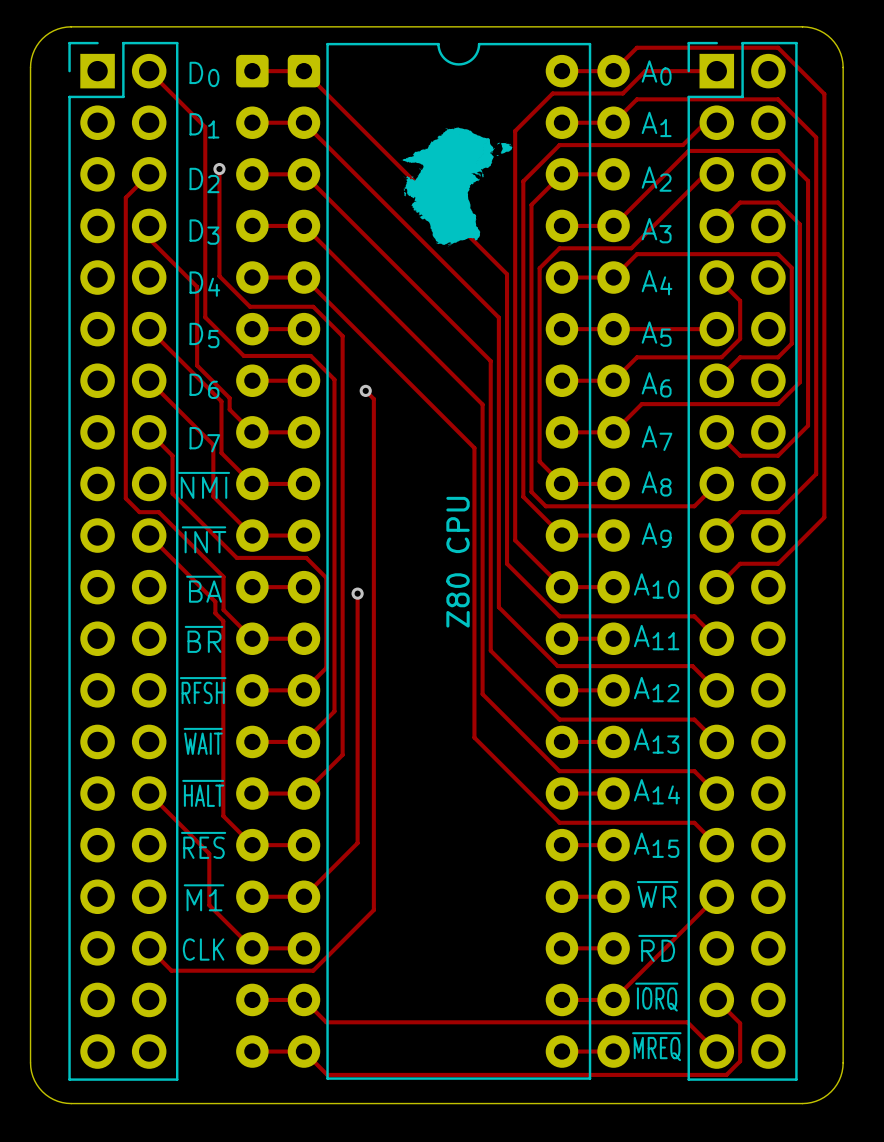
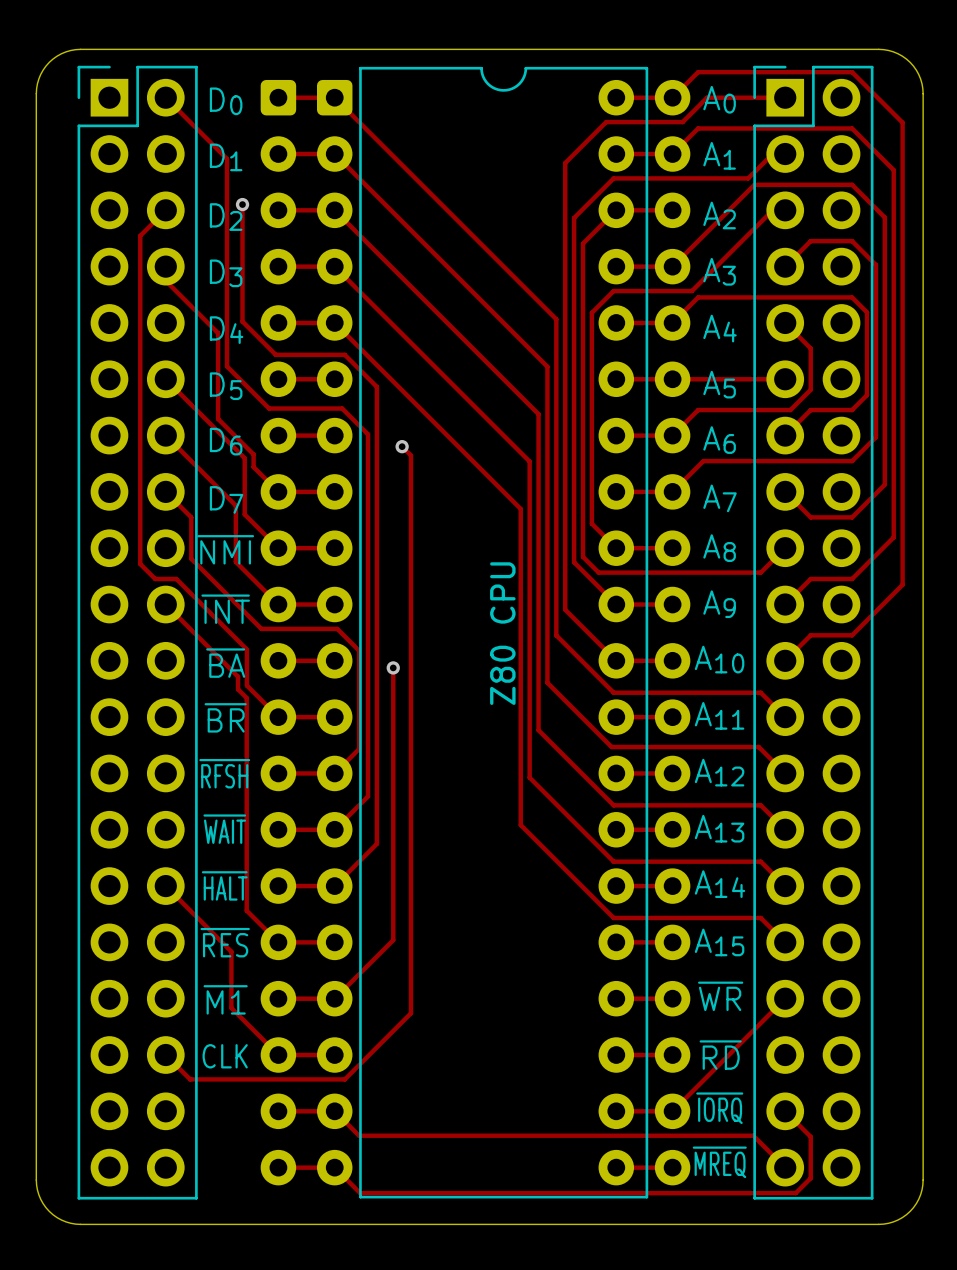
drawing: [400, 127, 513, 247] -> none

